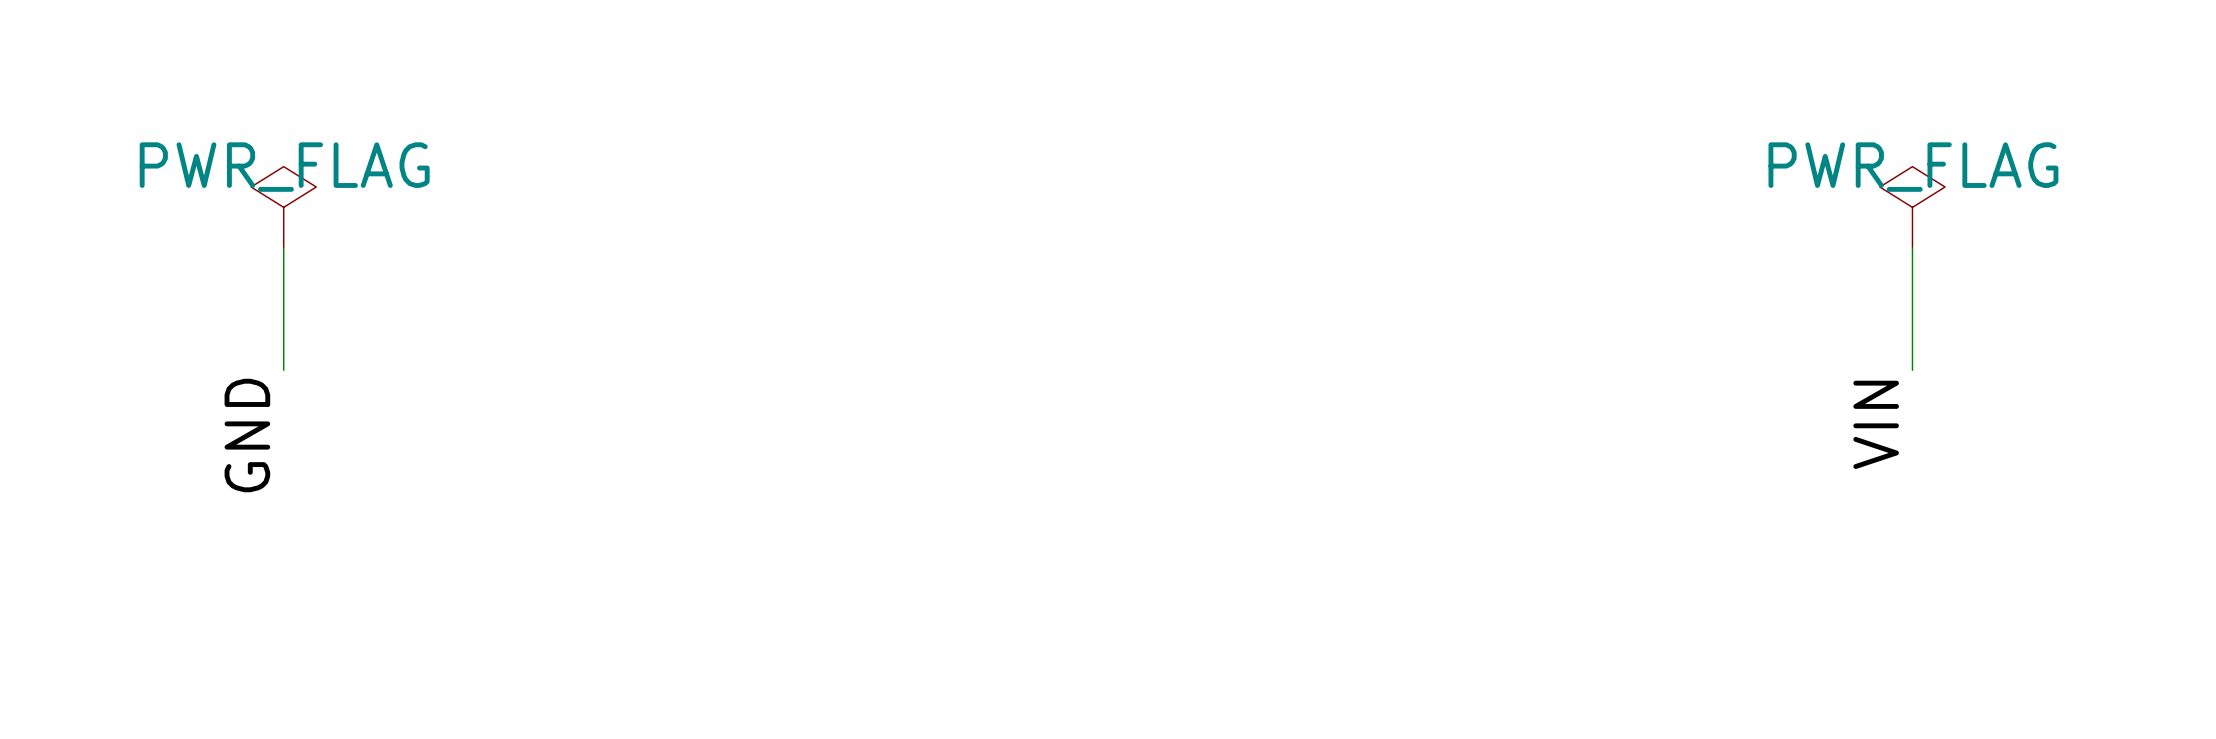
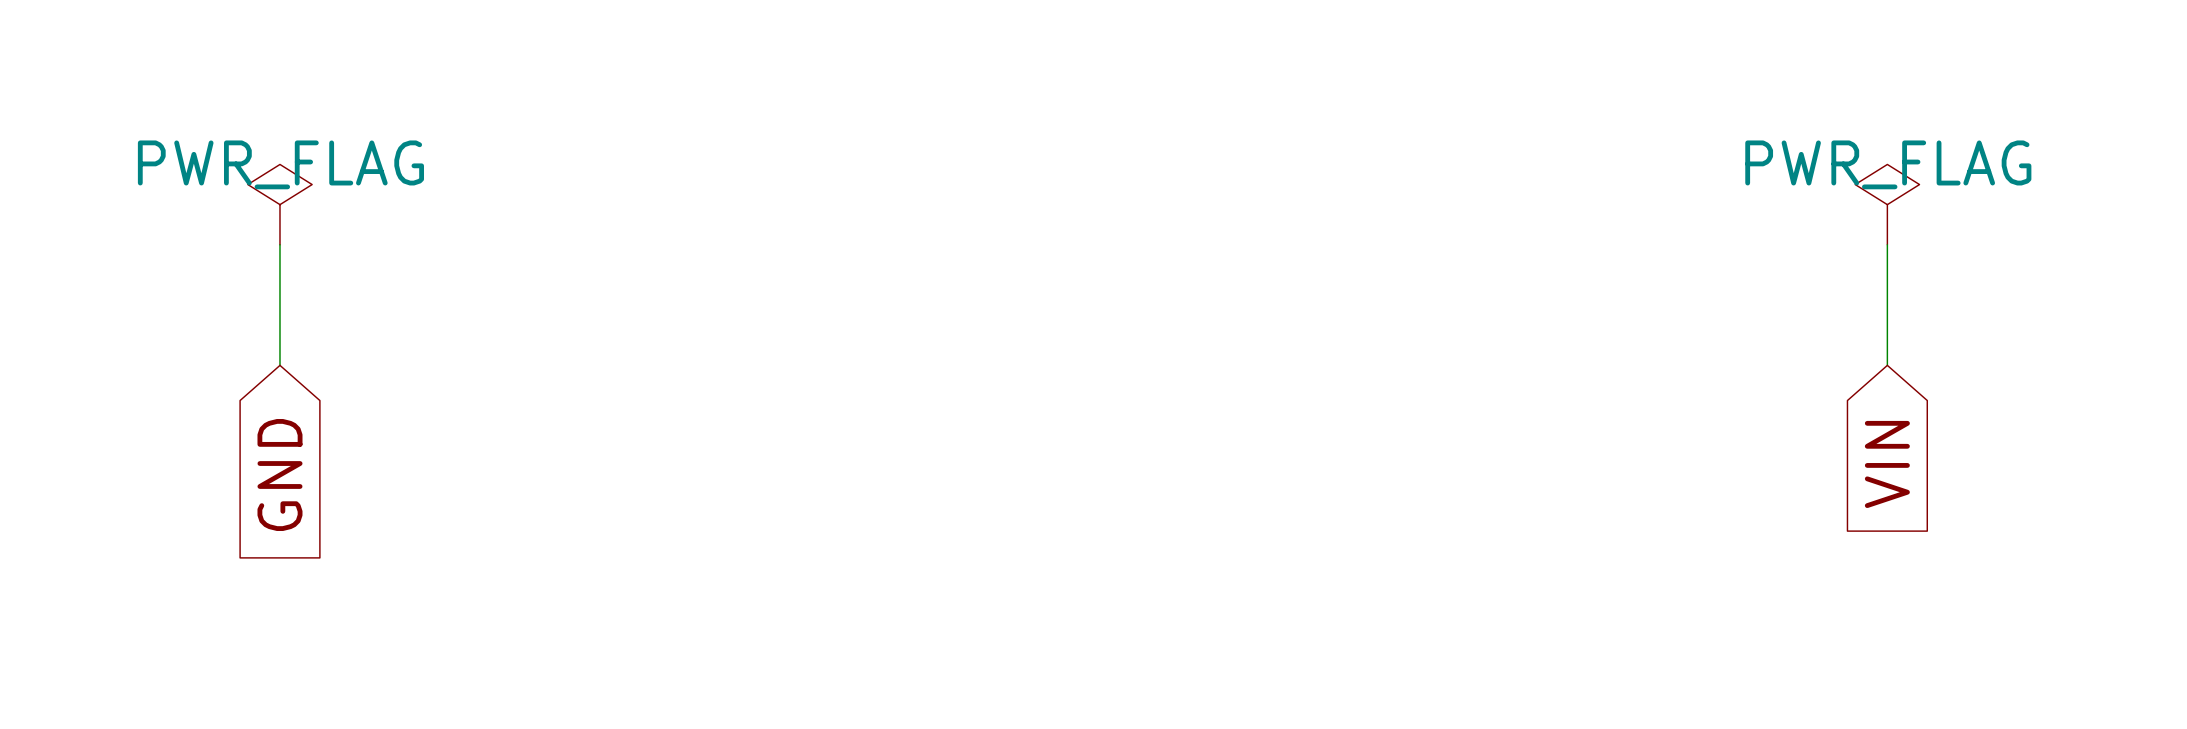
label: VIN (1876, 424) -> none
label: GND (247, 435) -> none
global label: none -> VIN (1887, 464)
global label: none -> GND (279, 475)

